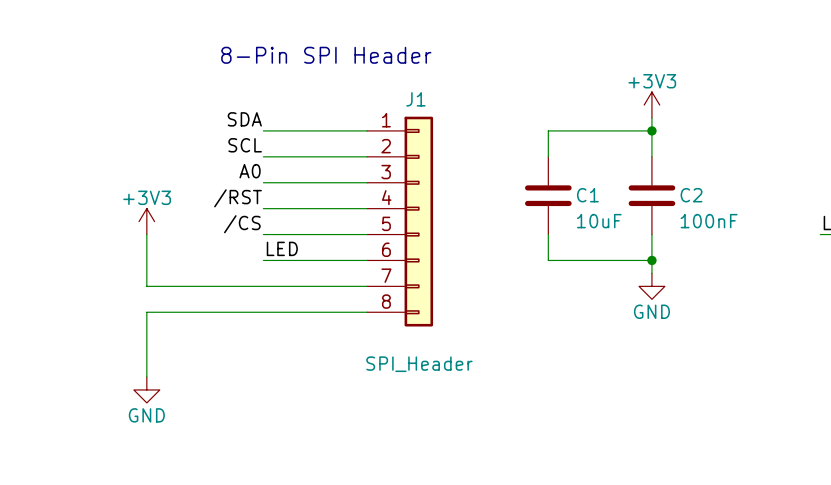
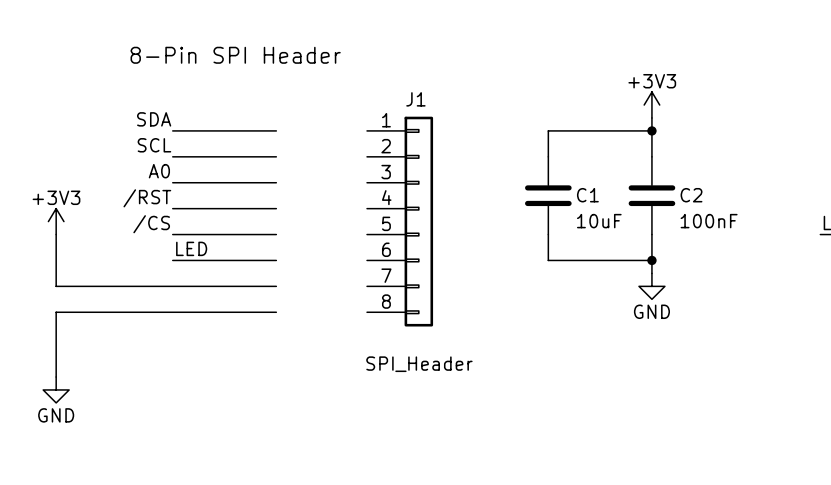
text position: 8-Pin SPI Header (326, 55) -> 8-Pin SPI Header (235, 55)
label position: SDA (244, 119) -> SDA (154, 119)
wire: (276, 130) (367, 130) -> (172, 130) (263, 130)
label position: SCL (245, 145) -> SCL (154, 145)
wire: (276, 156) (367, 156) -> (172, 156) (263, 156)
label position: A0 (250, 171) -> A0 (159, 171)
wire: (276, 182) (367, 182) -> (172, 182) (263, 182)
label position: /RST (238, 198) -> /RST (147, 198)
wire: (276, 208) (367, 208) -> (172, 208) (263, 208)
power symbol position: +3V3 (146, 221) -> +3V3 (56, 221)
label position: /CS (242, 224) -> /CS (151, 224)
wire: (146, 234) (146, 286) -> (56, 234) (56, 286) (146, 286)
wire: (276, 234) (367, 234) -> (172, 234) (263, 234)
label position: LED (282, 248) -> LED (191, 248)
wire: (276, 260) (367, 260) -> (172, 260) (263, 260)
wire: (276, 286) (367, 286) -> none
wire: (146, 312) (146, 377) -> (146, 312) (56, 312) (56, 377)
wire: (276, 312) (367, 312) -> none
power symbol position: GND (146, 389) -> GND (56, 389)

